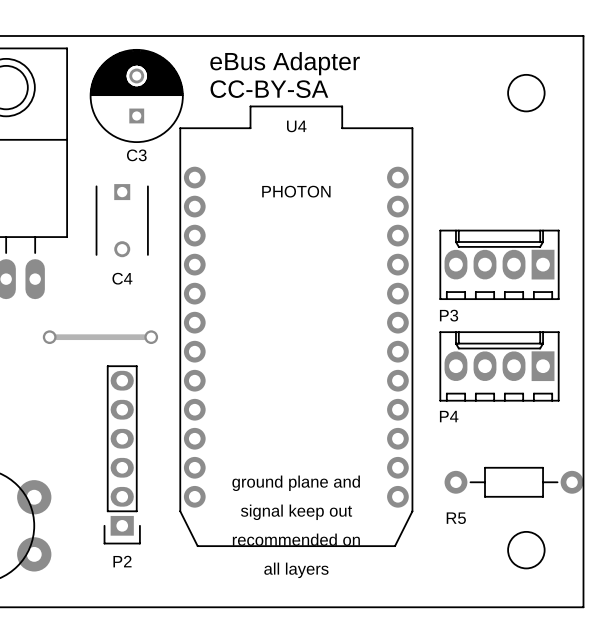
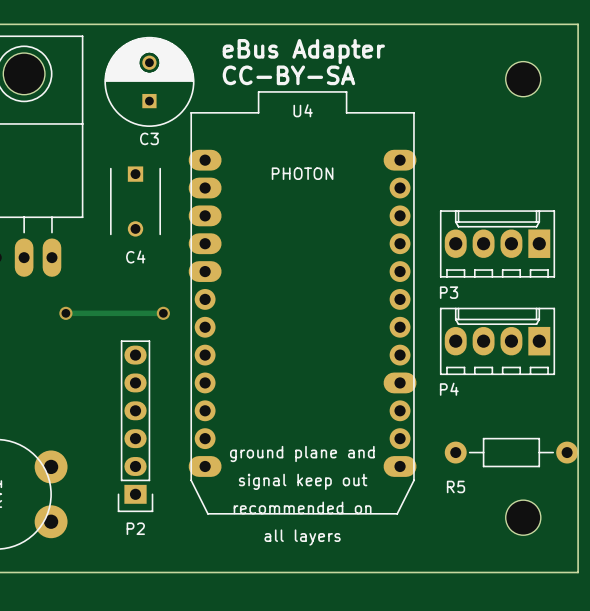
U4 footprint: [179, 105, 414, 547] -> [188, 91, 417, 515]

